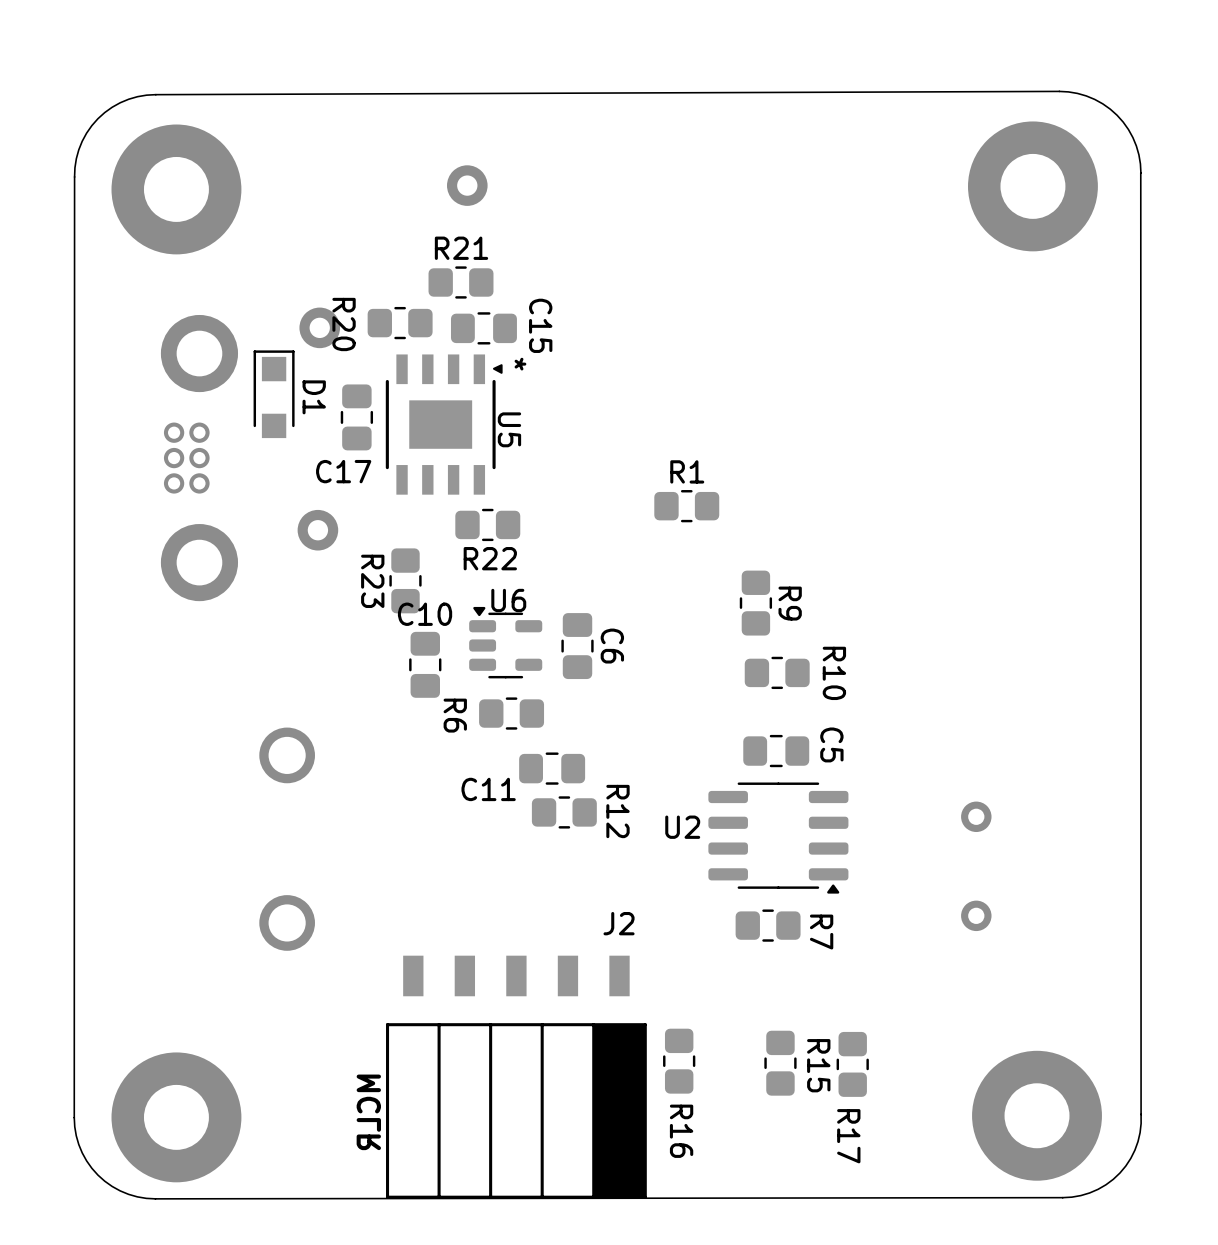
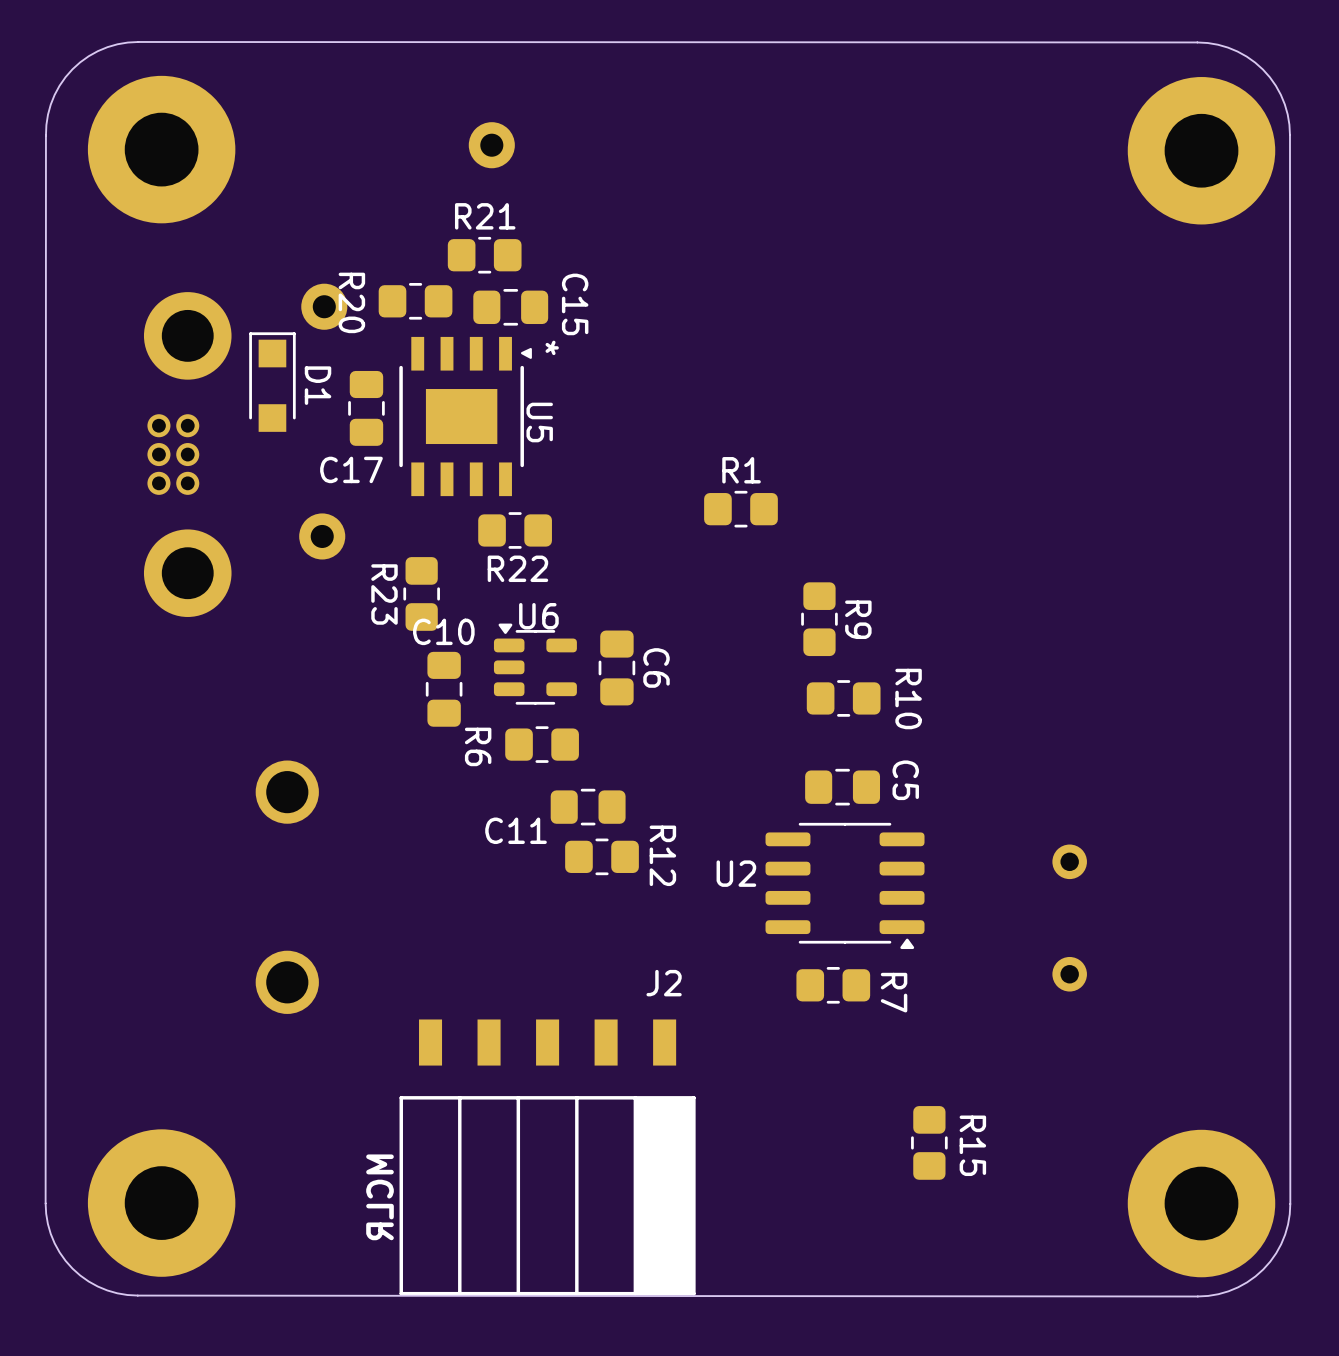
board edge: (155, 94) (1068, 91) (1094, 99) (1117, 115) (1132, 137) (1138, 154) (1140, 173) -> none
board edge: (1140, 172) (1141, 1123) (1134, 1150) (1119, 1173) (1105, 1184) (1089, 1192) (1062, 1197) (155, 1198) -> (138, 41) (1197, 42) (1227, 47) (1246, 56) (1262, 69) (1280, 94) (1287, 114) (1289, 135) (1290, 1203) (1285, 1234) (1270, 1261) (1255, 1276) (1237, 1287) (1208, 1295) (137, 1295)
part position: (1032, 186) -> (1201, 150)
R16: (679, 1061) -> none
R15: (780, 1063) -> none
part position: (1037, 1115) -> (1201, 1203)
R17 name: R17 (848, 1136) -> R15 (972, 1145)

